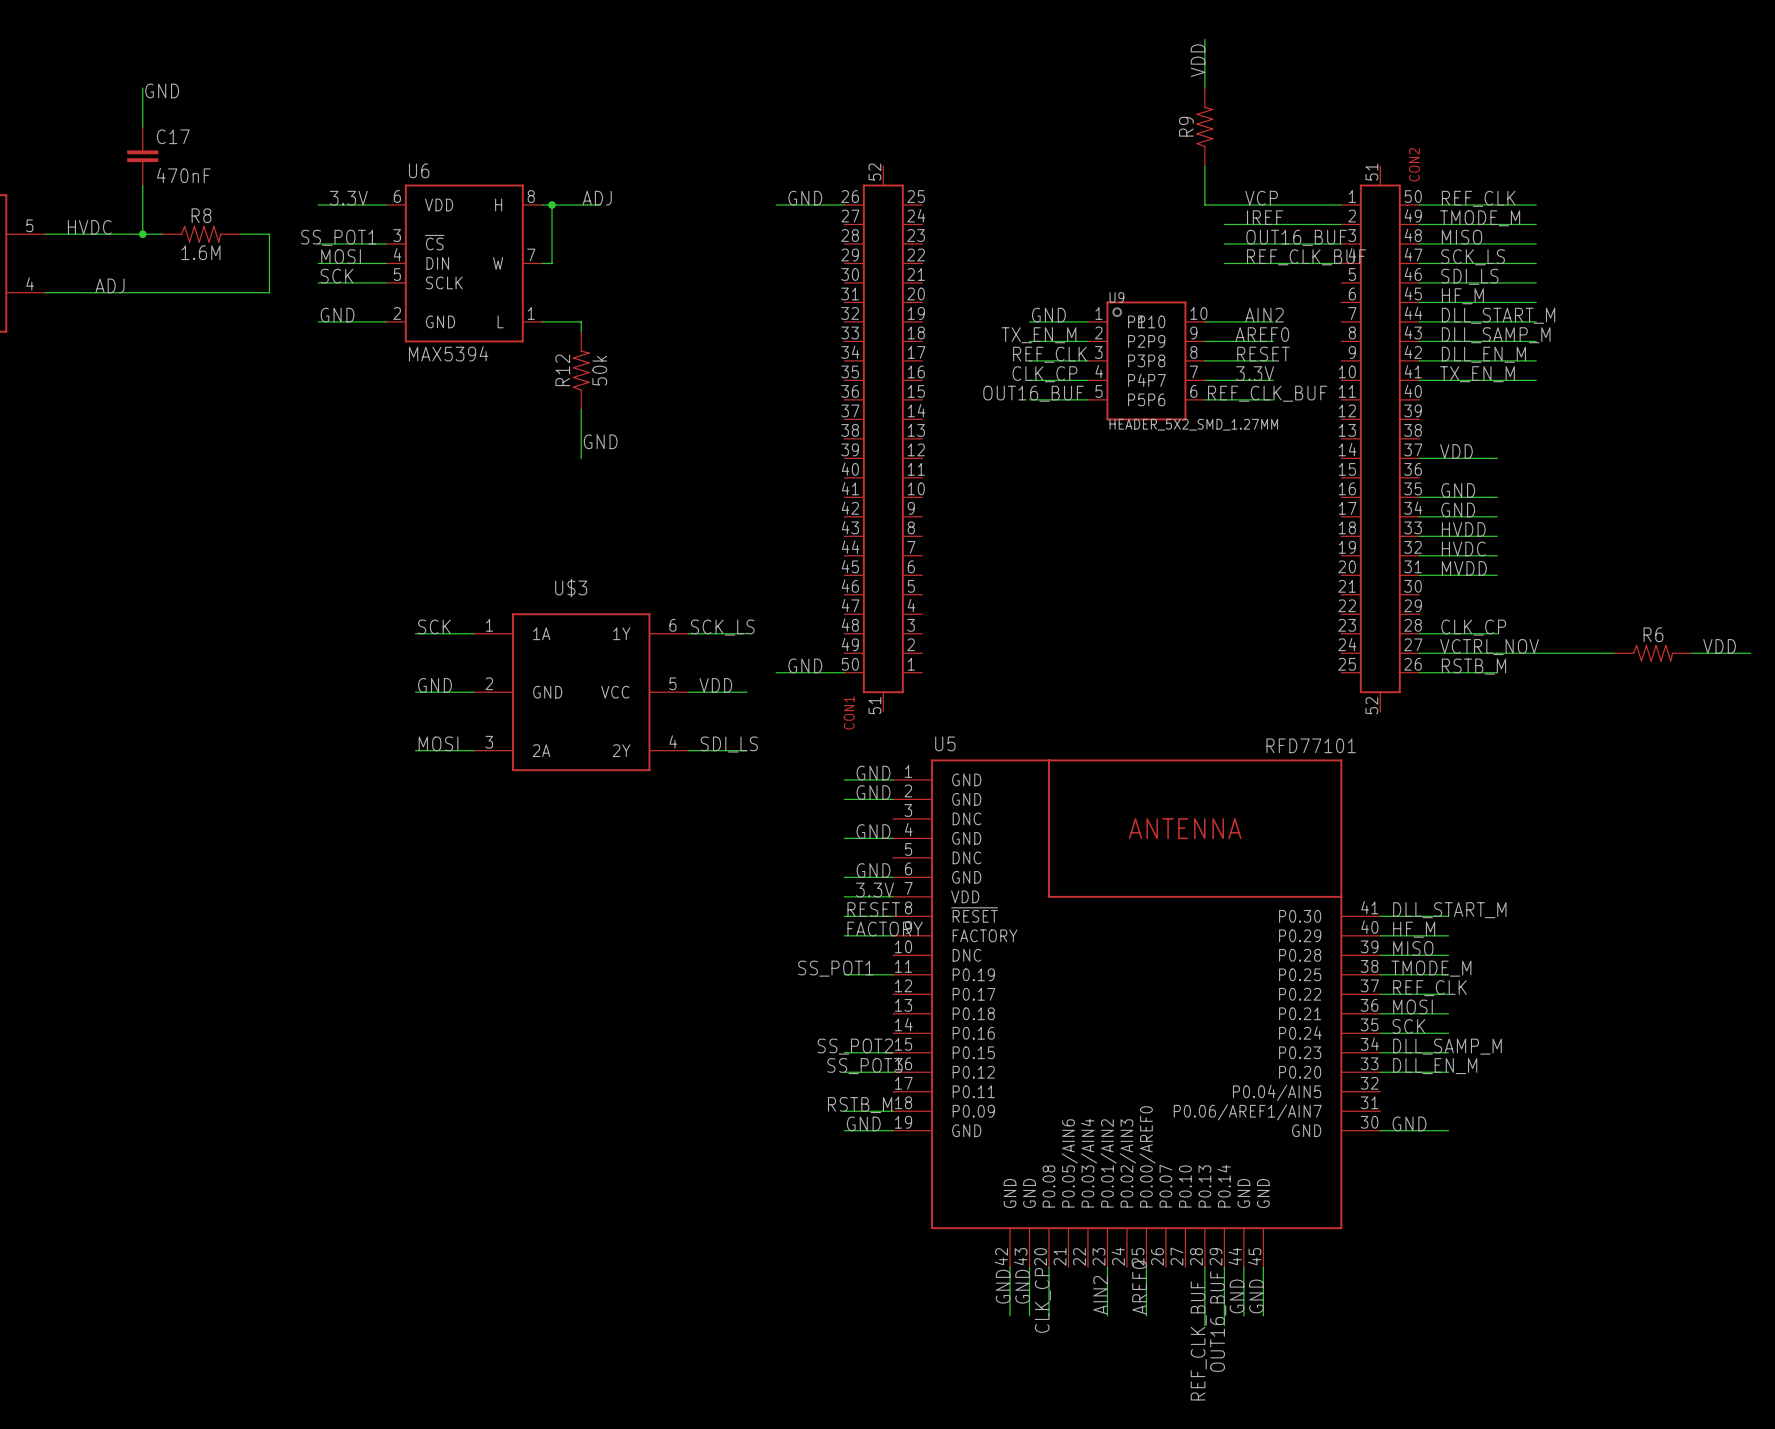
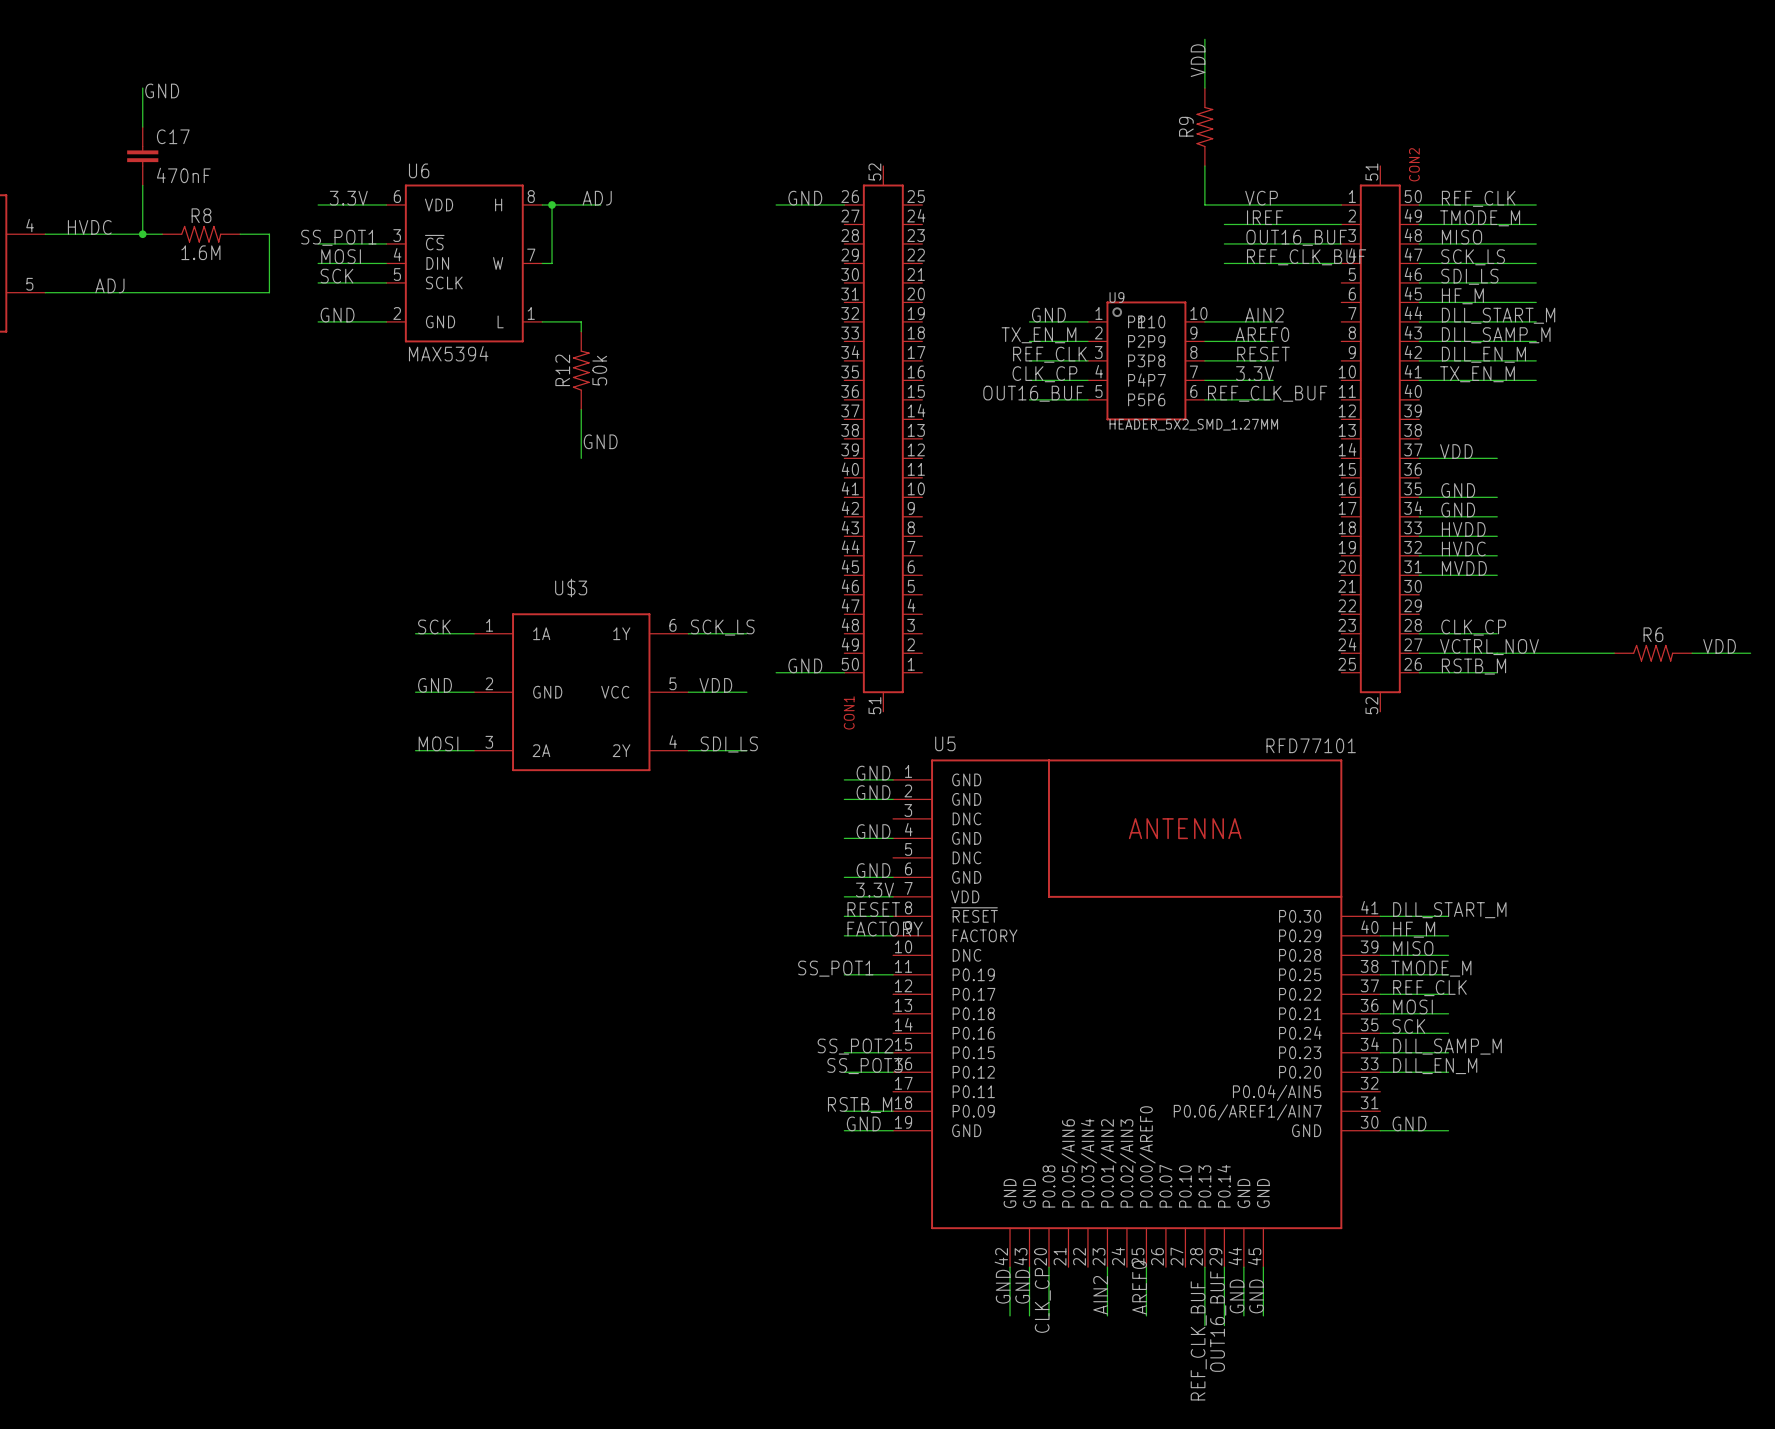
part pin number: 5 (29, 225) -> 4 (30, 225)
part pin number: 4 (30, 283) -> 5 (29, 284)

